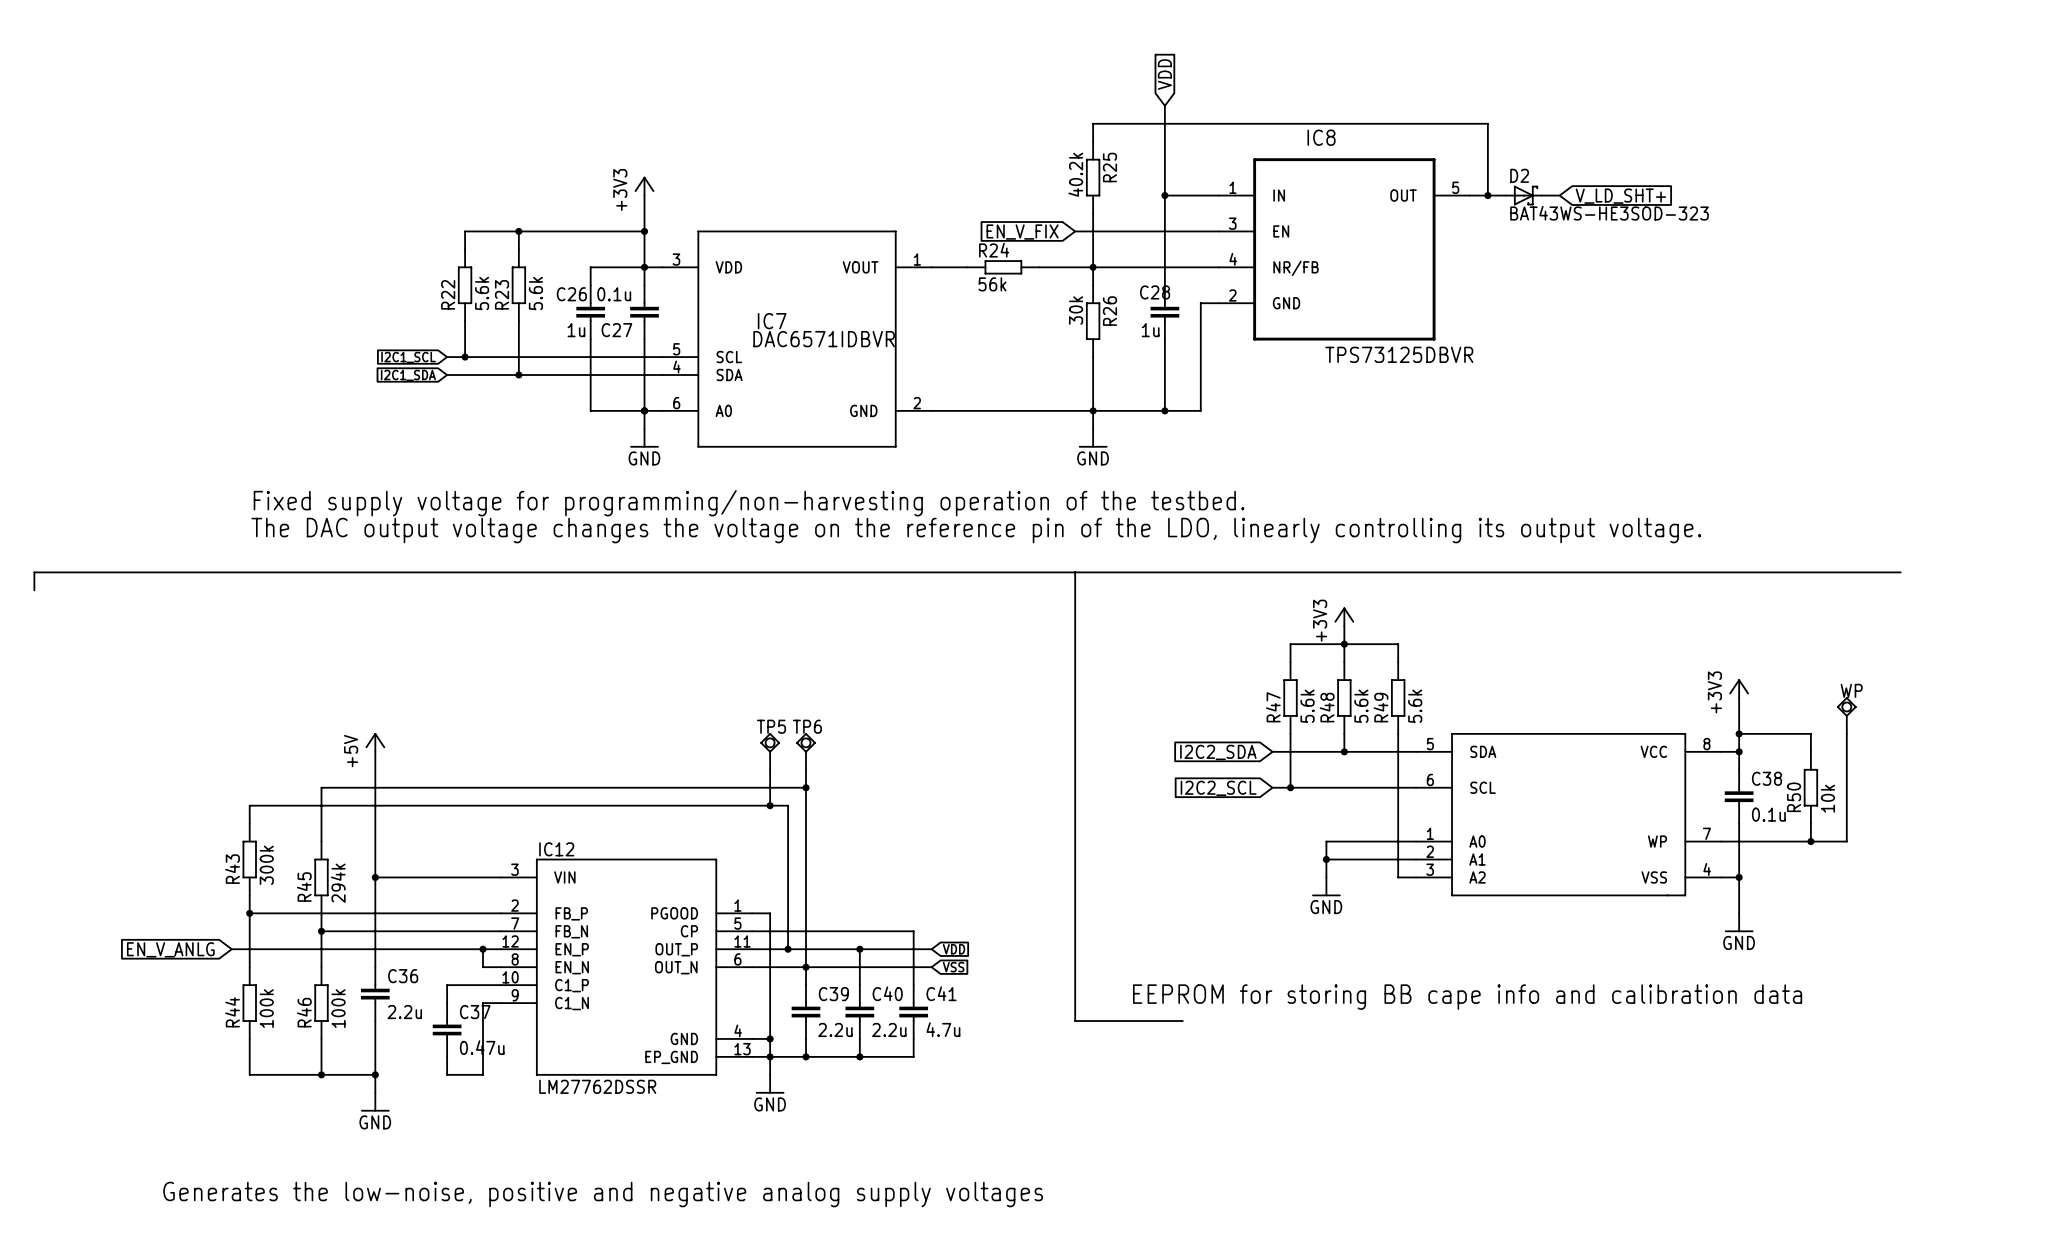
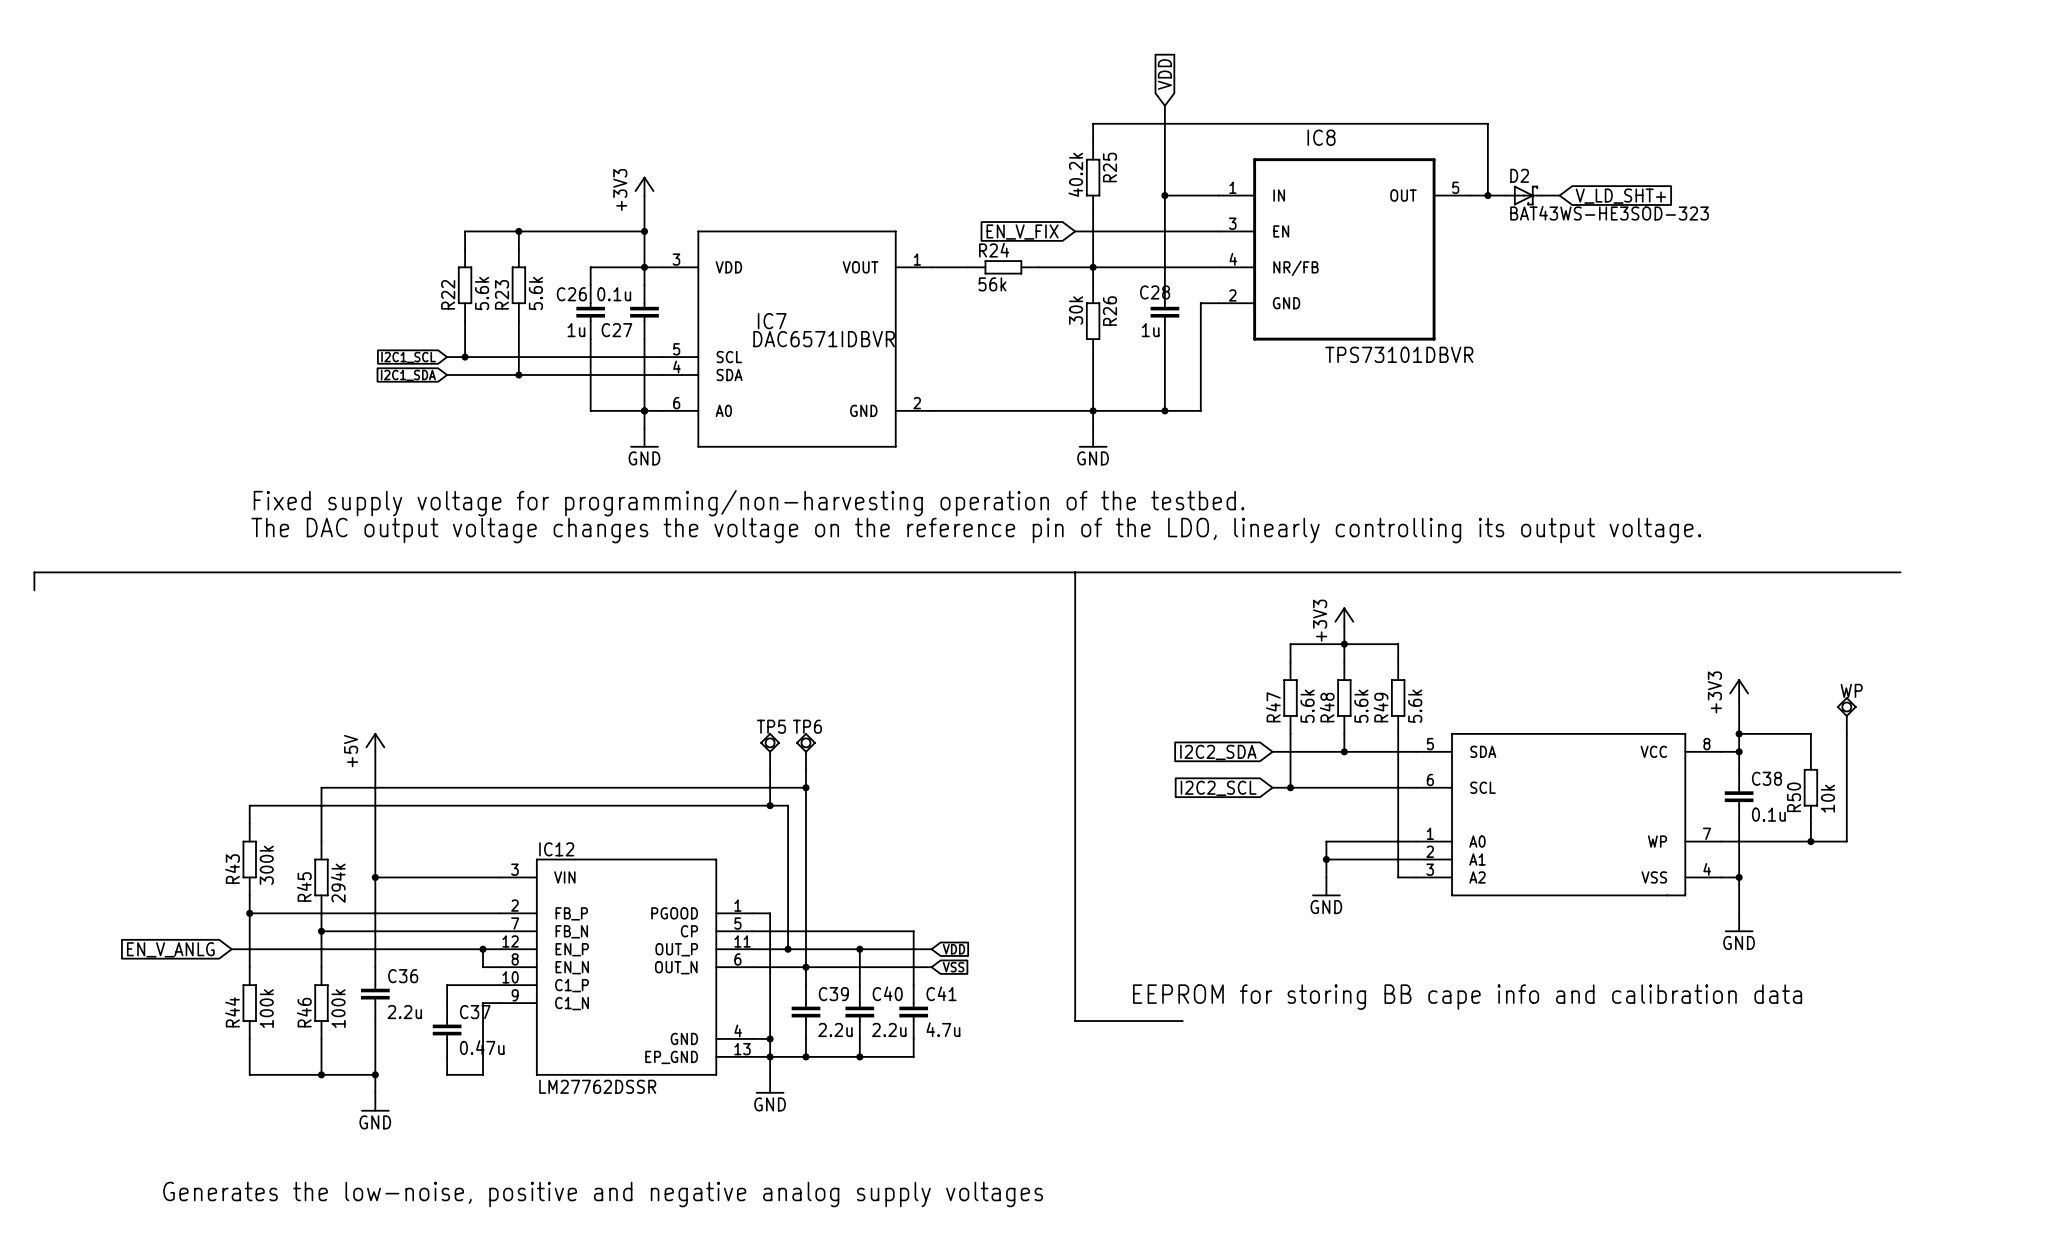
IC8 value: TPS73125DBVR (1399, 354) -> TPS73101DBVR (1399, 354)

